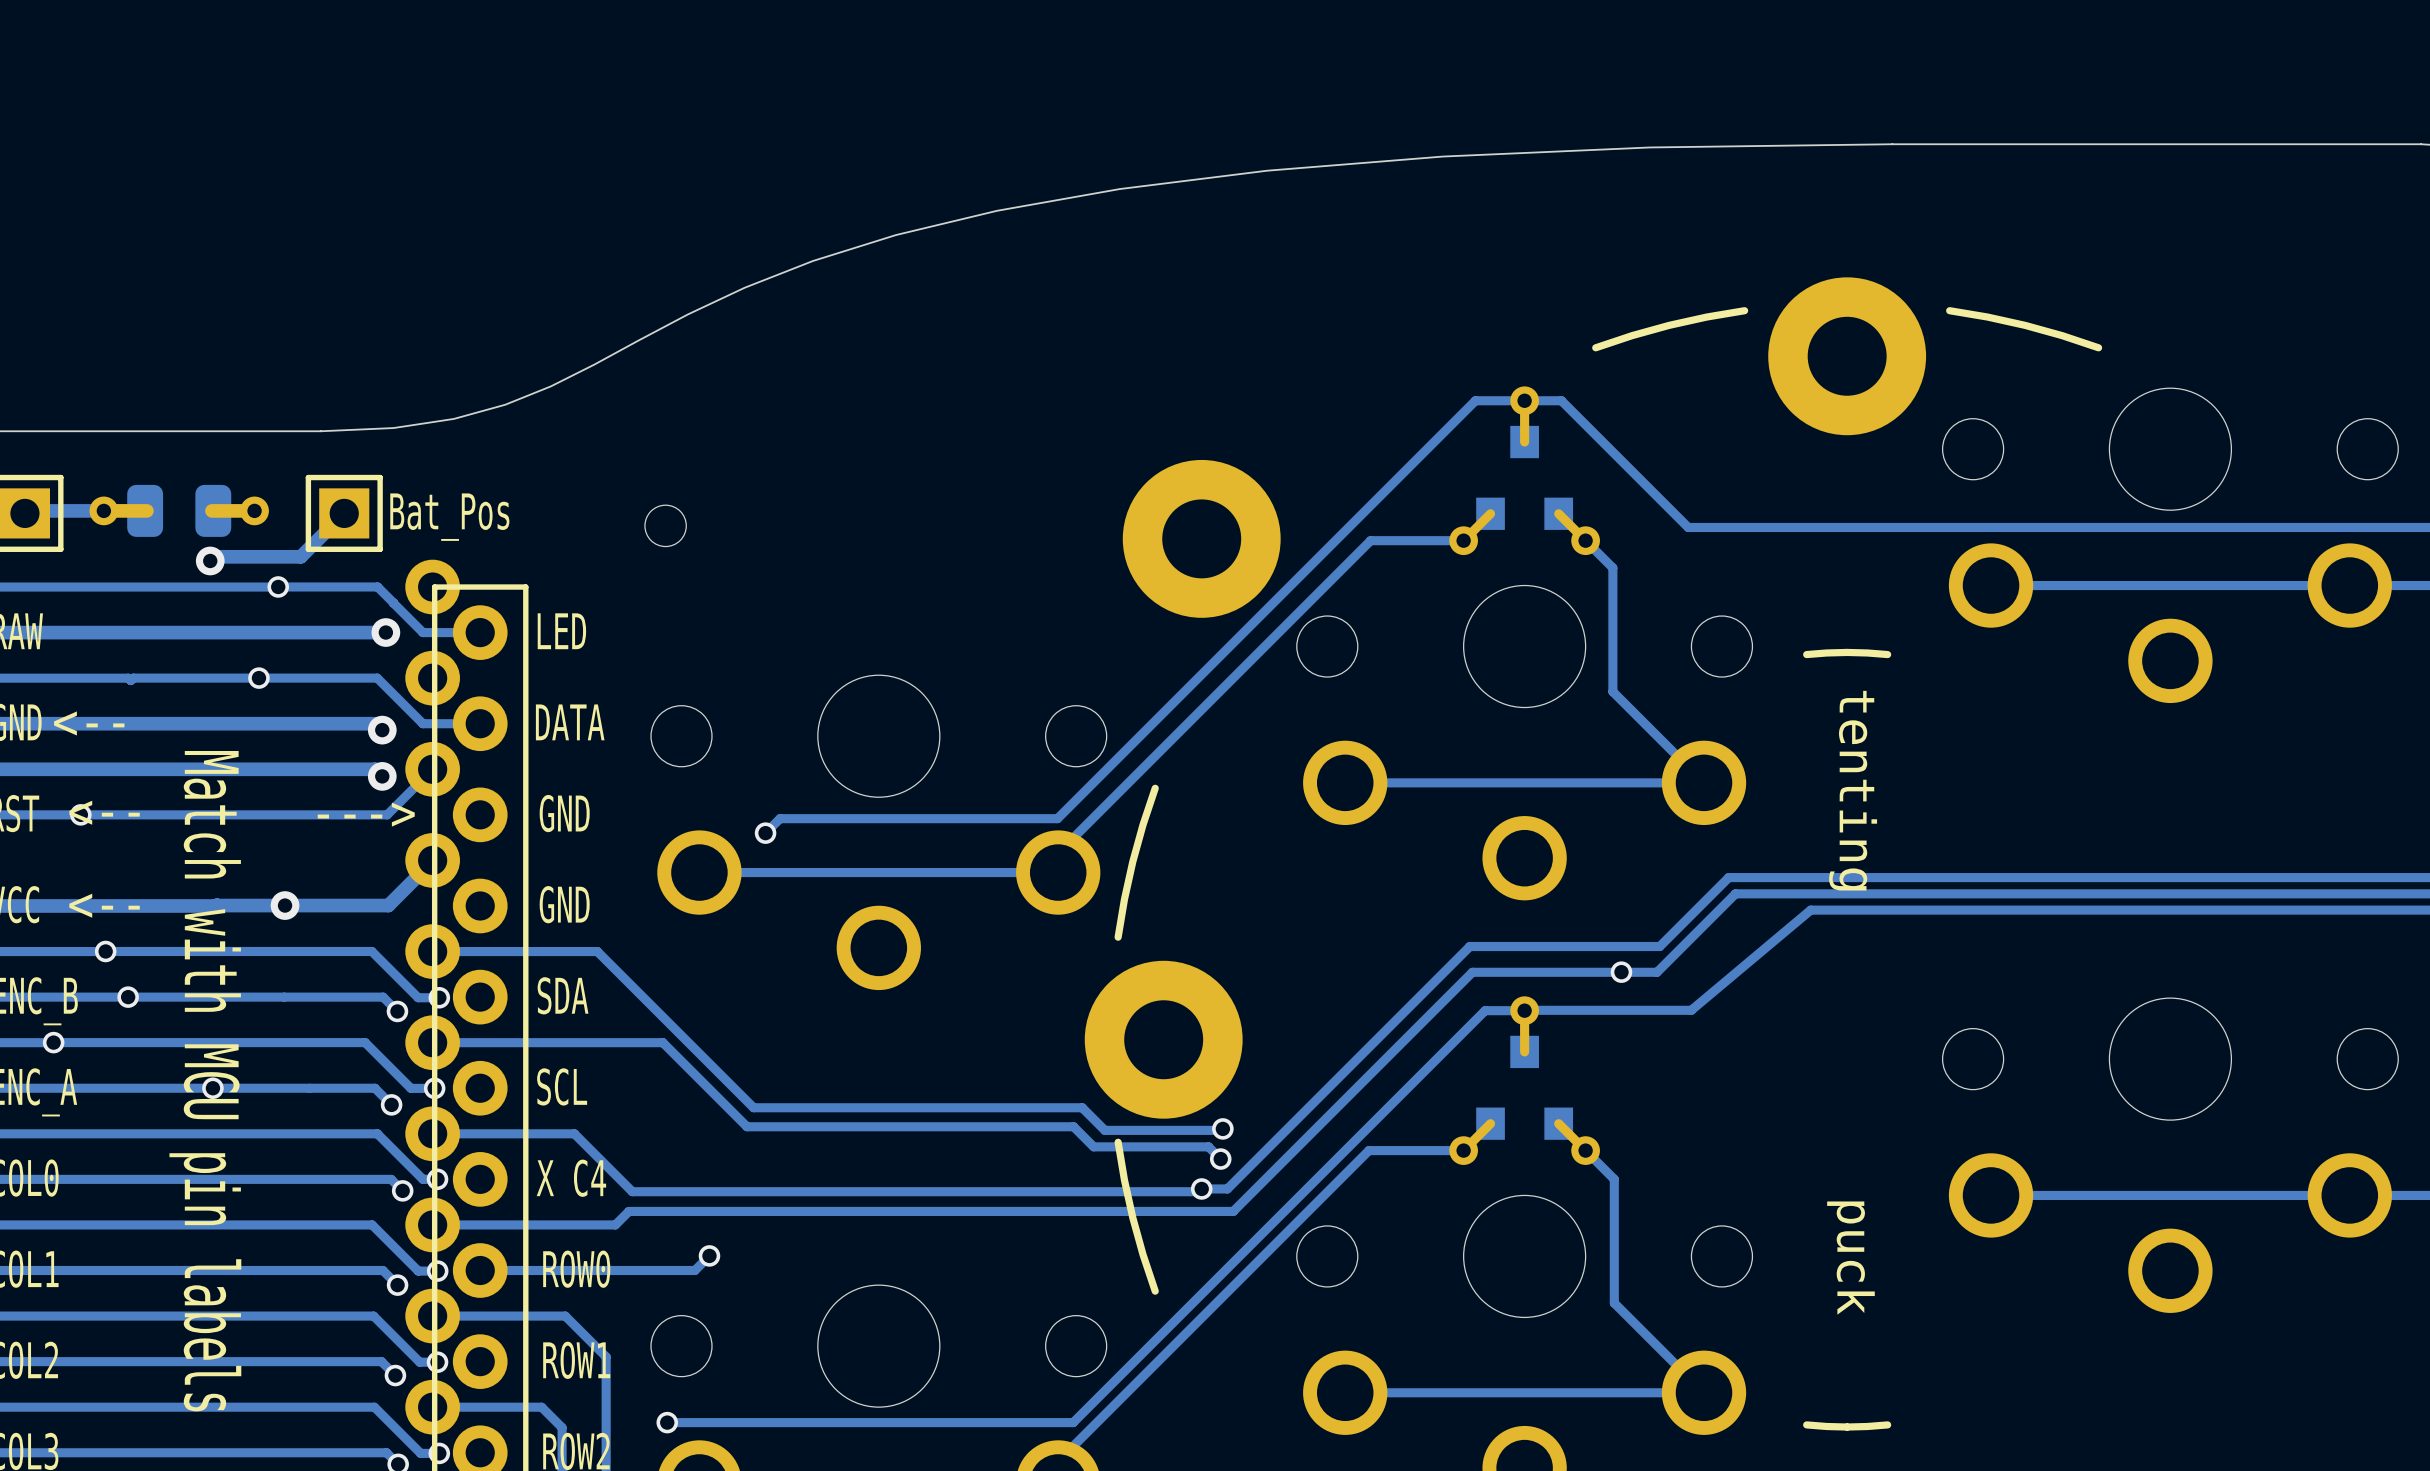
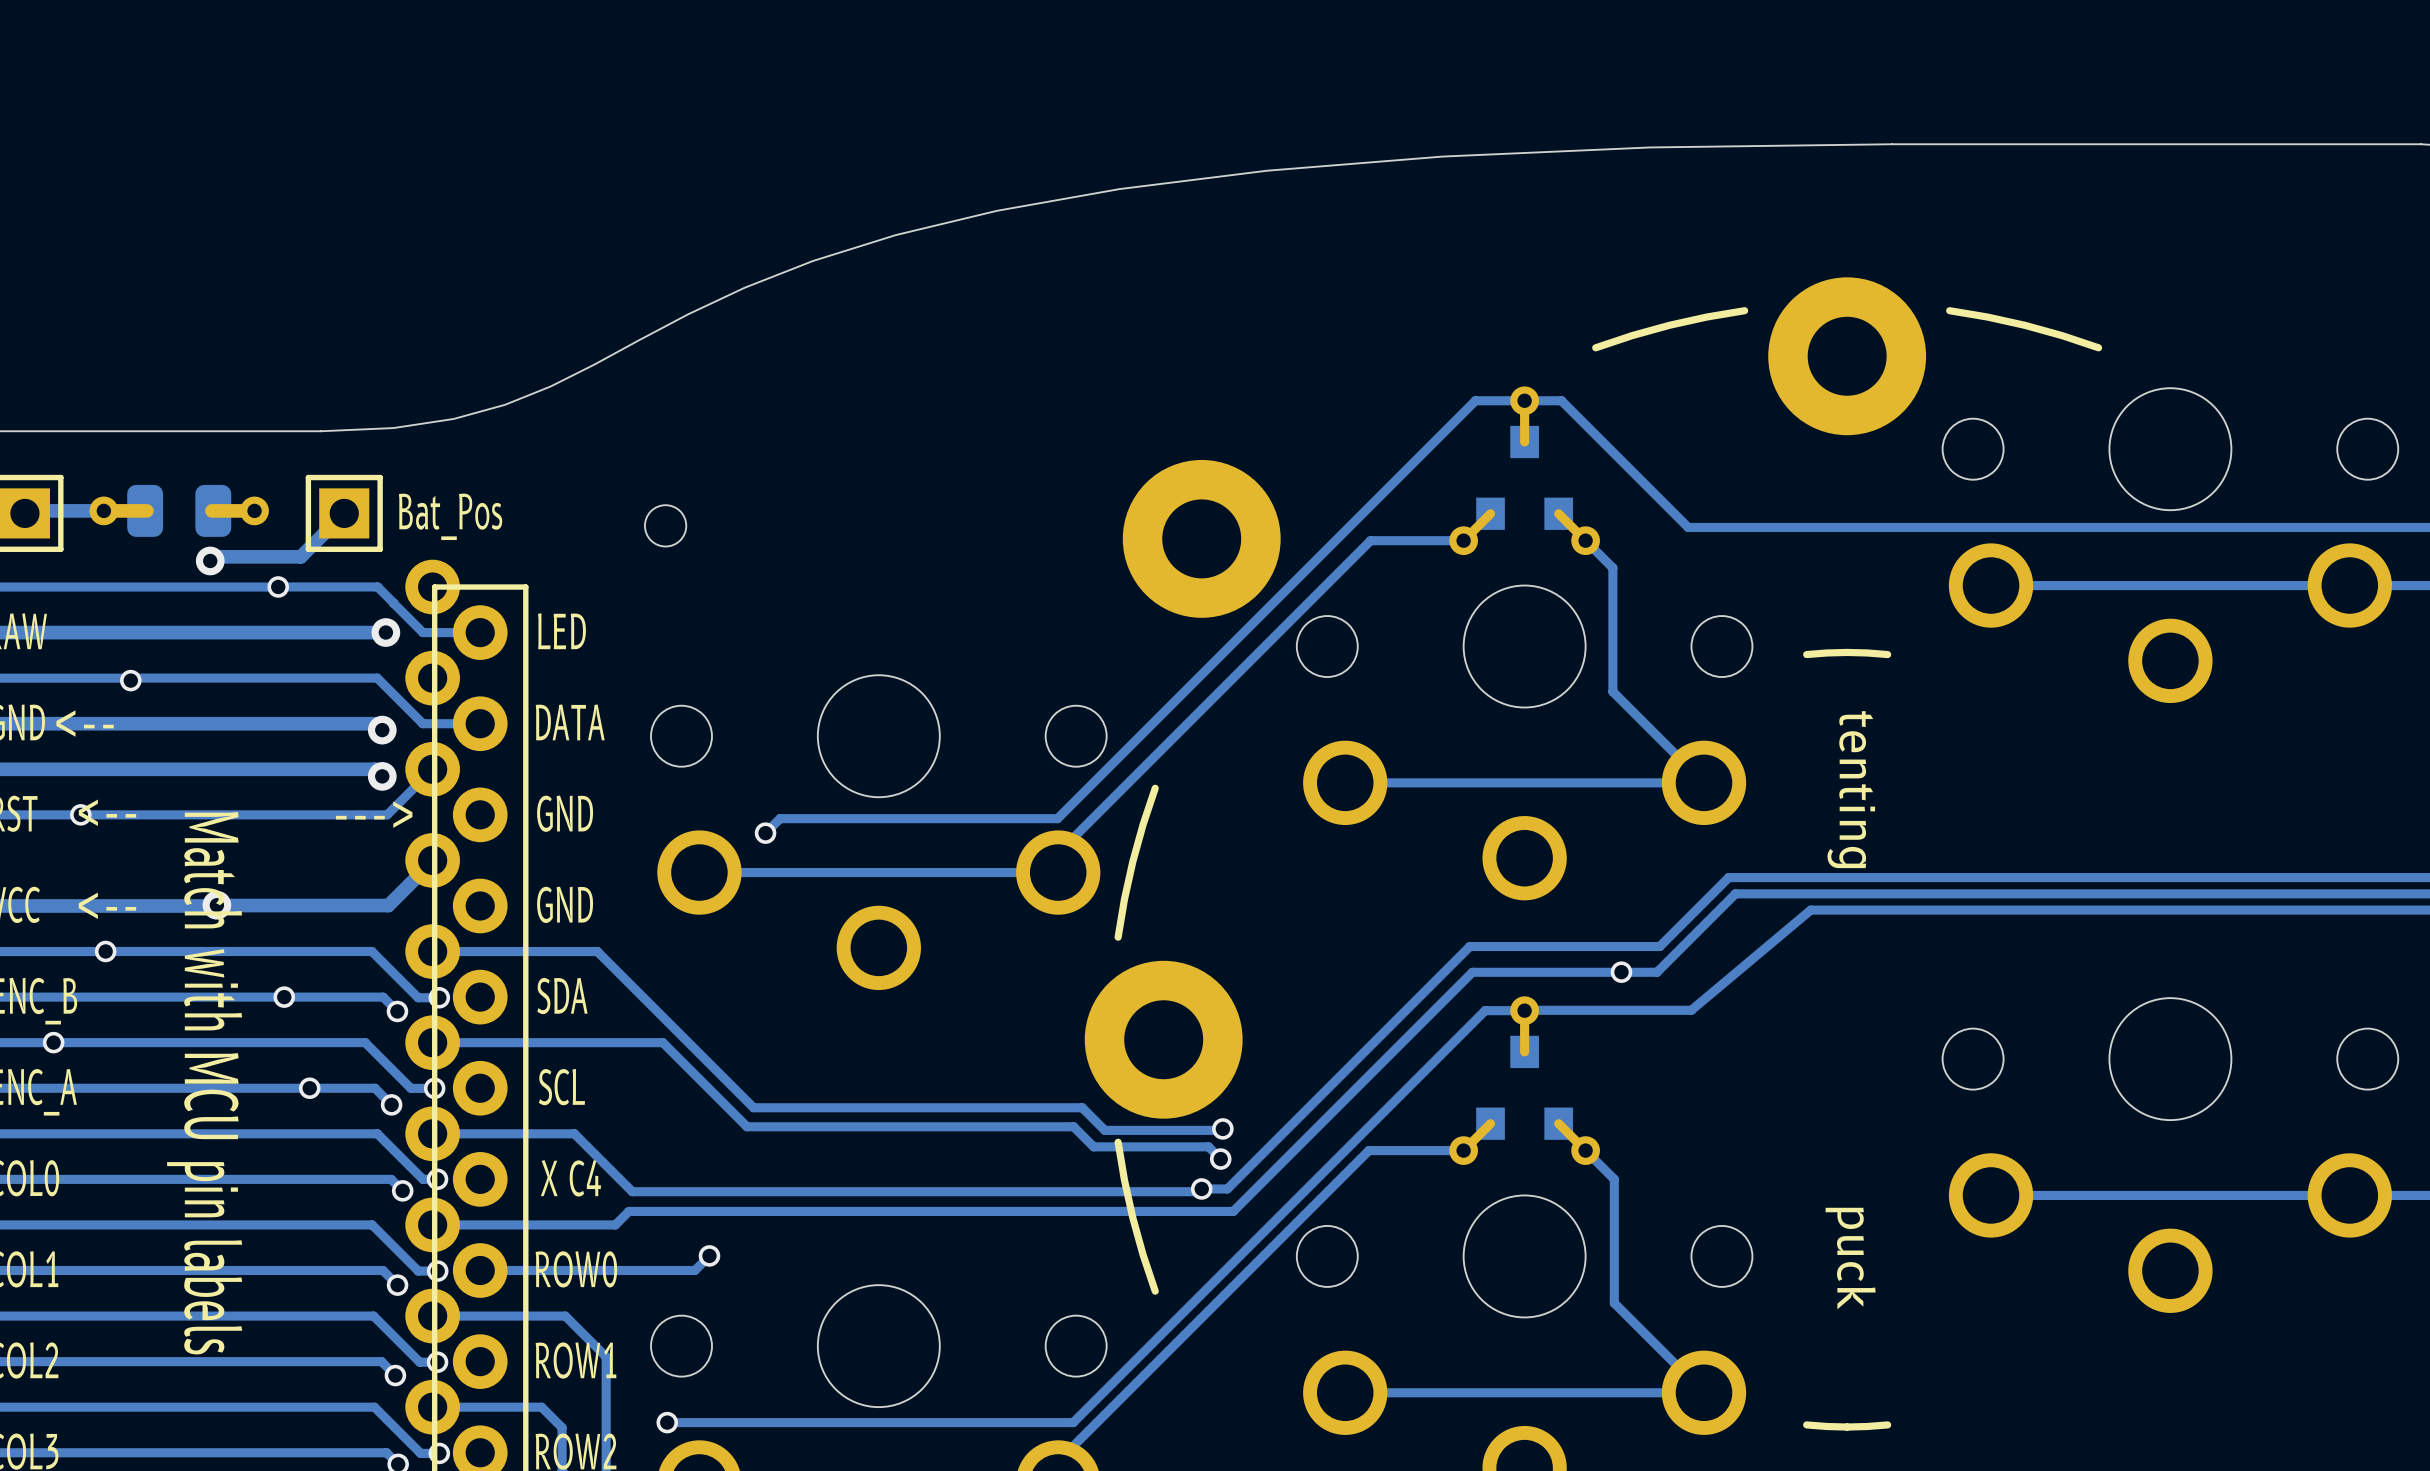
via position: (258, 678) -> (130, 680)
via position: (285, 905) -> (216, 905)
via: (128, 997) -> none
via: none -> (284, 997)
via: (212, 1088) -> none
via: none -> (309, 1088)

